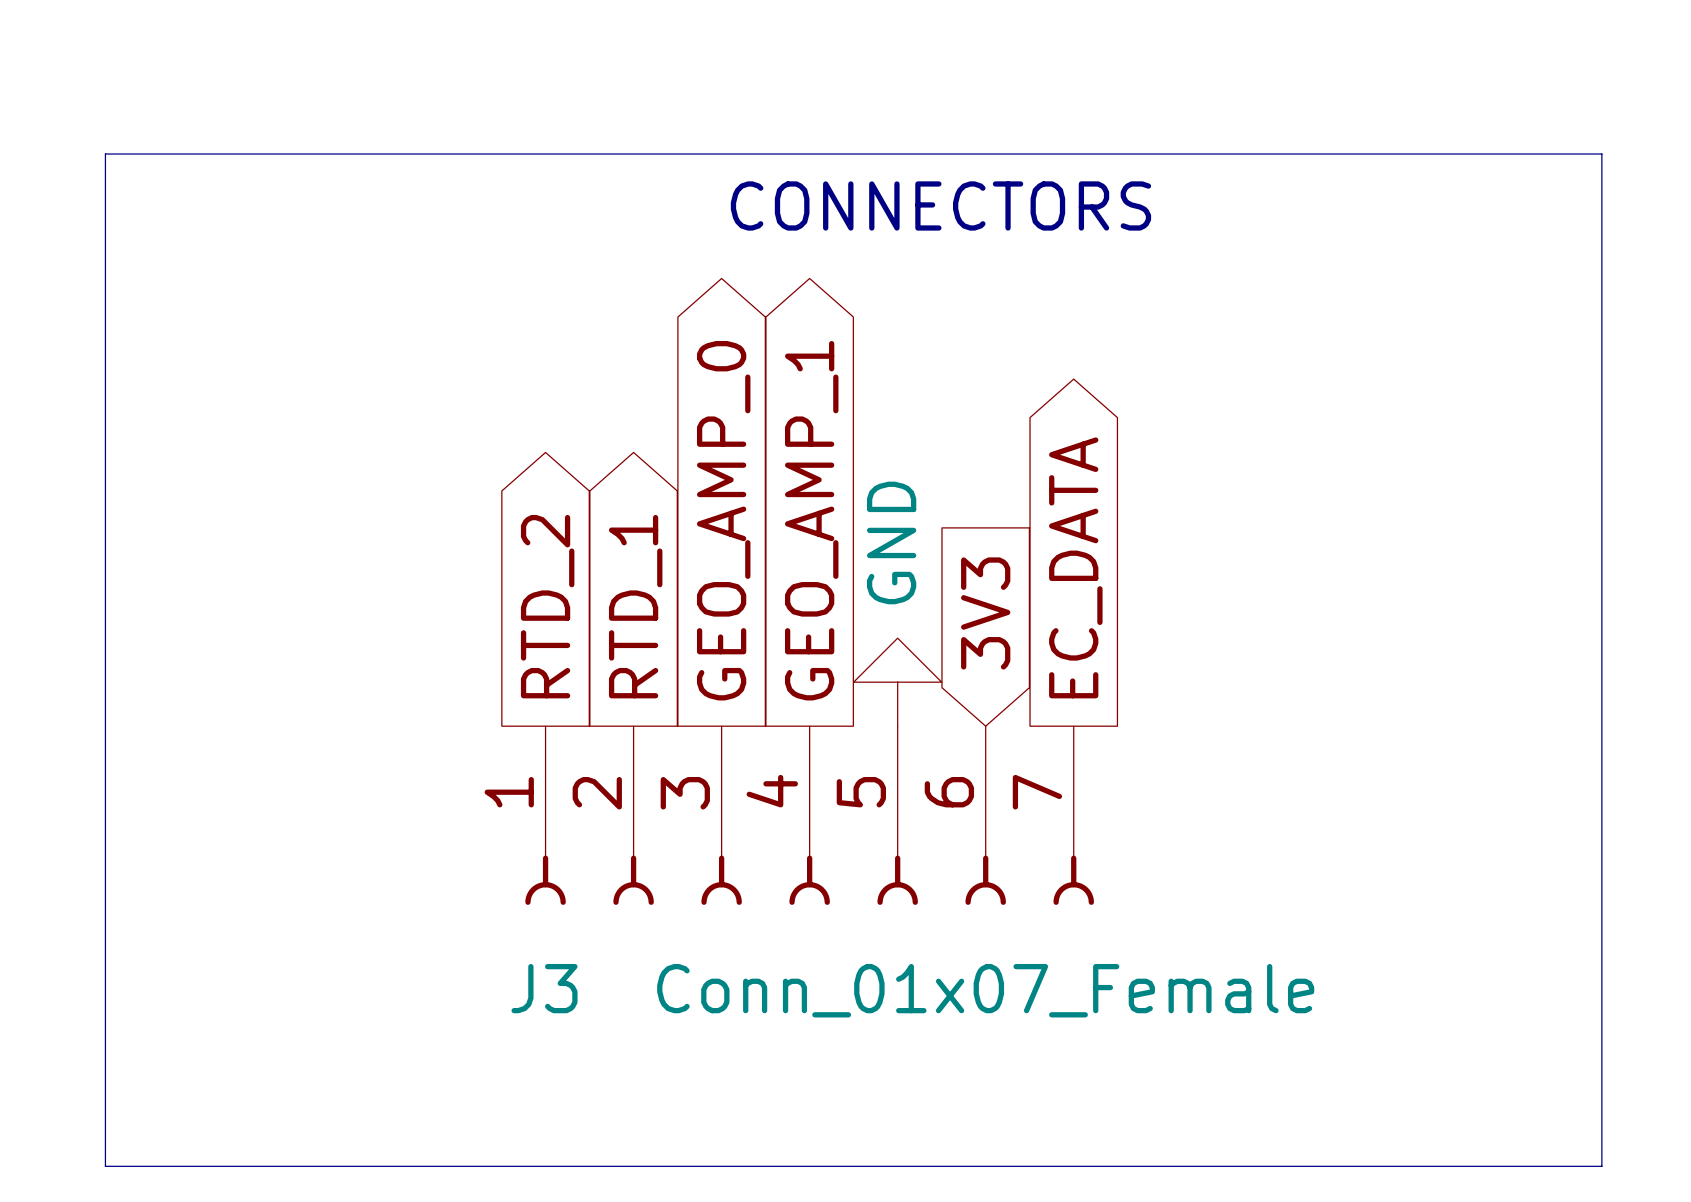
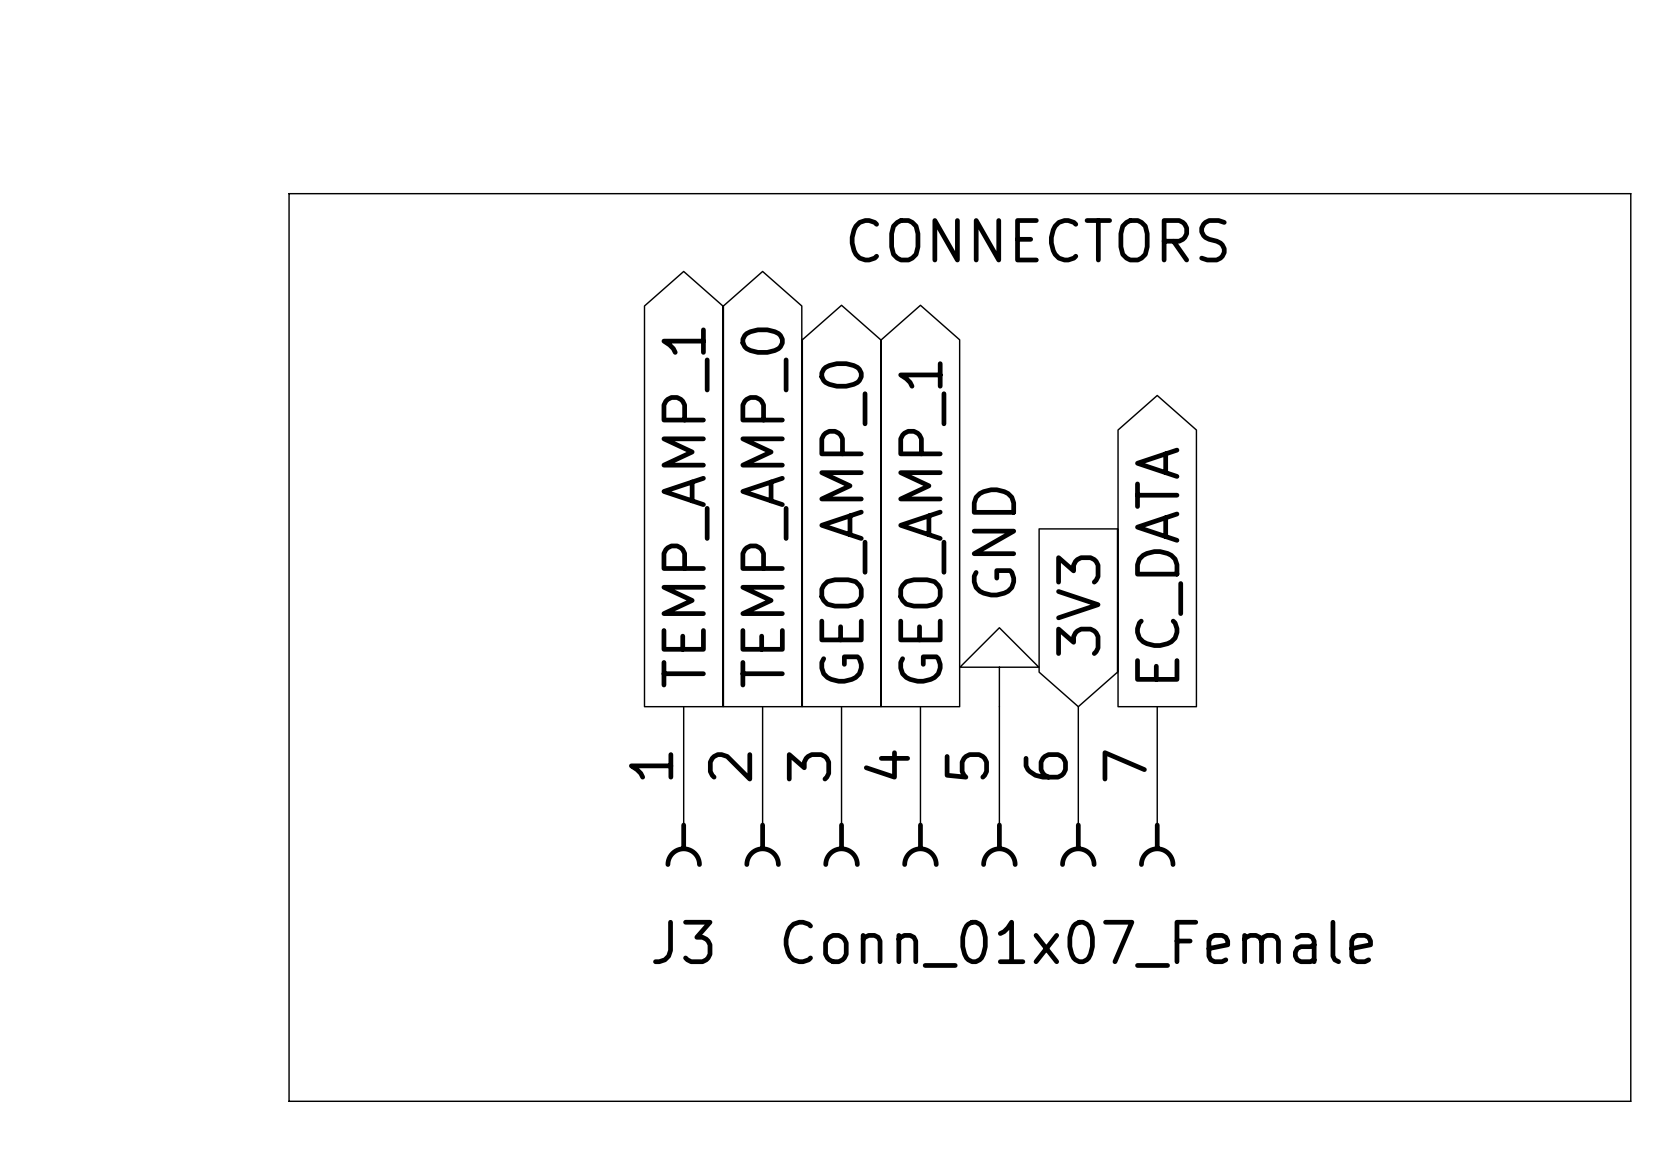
global label: RTD_2 (547, 606) -> TEMP_AMP_1 (685, 507)
global label: RTD_1 (635, 606) -> TEMP_AMP_0 (764, 507)

